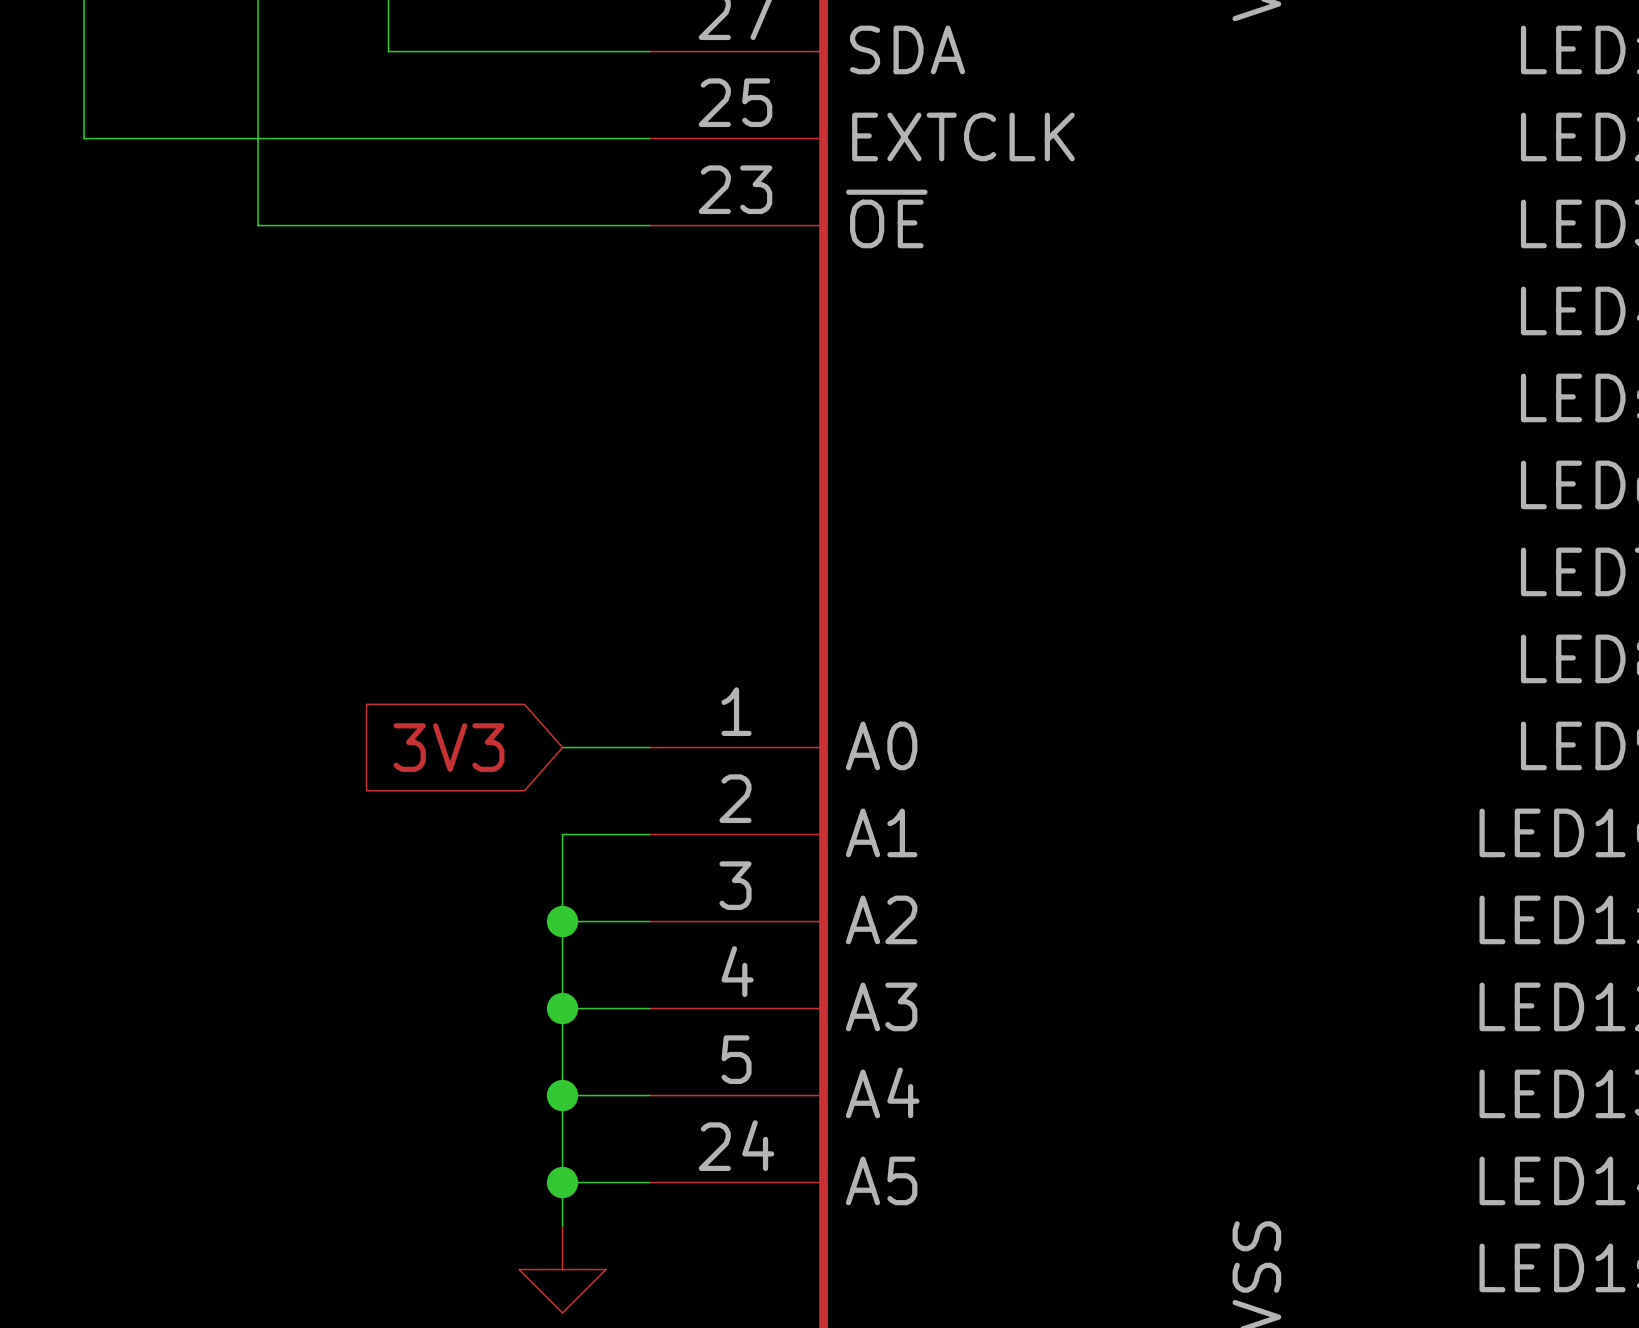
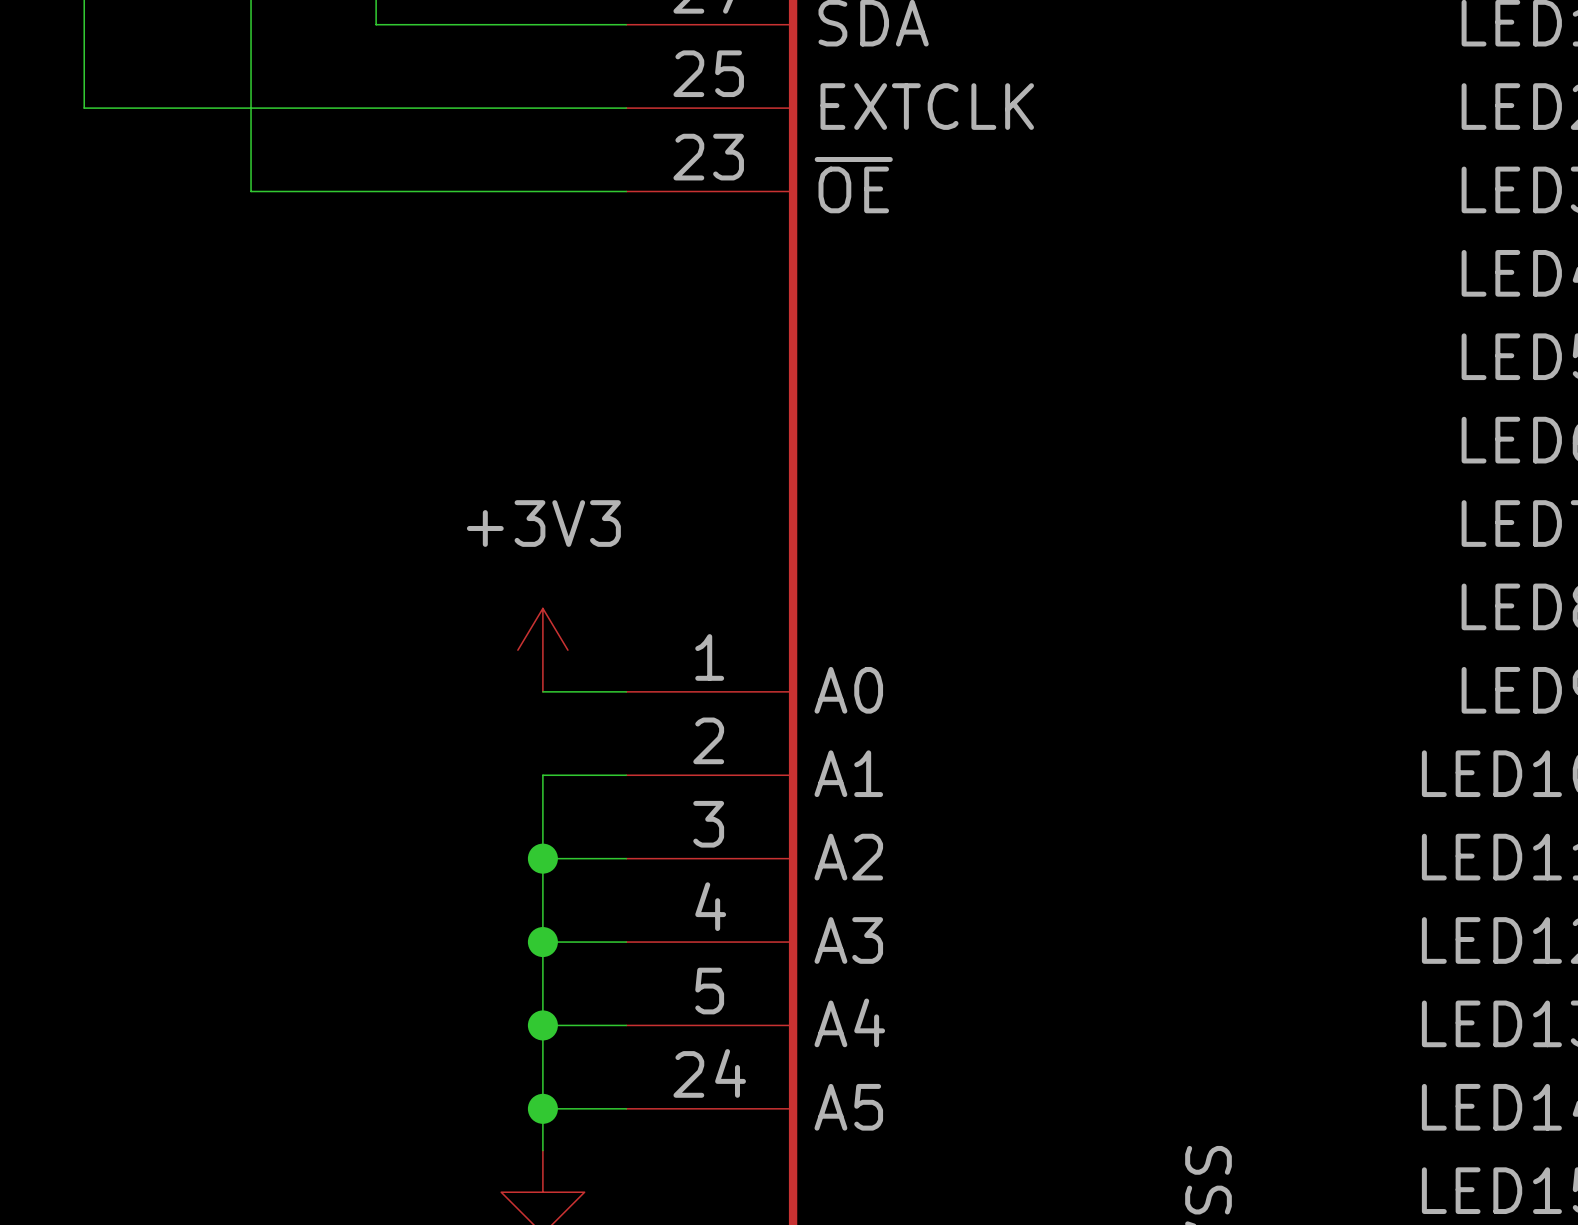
power symbol: none -> +3V3 (542, 650)
global label: 3V3 (449, 747) -> none

